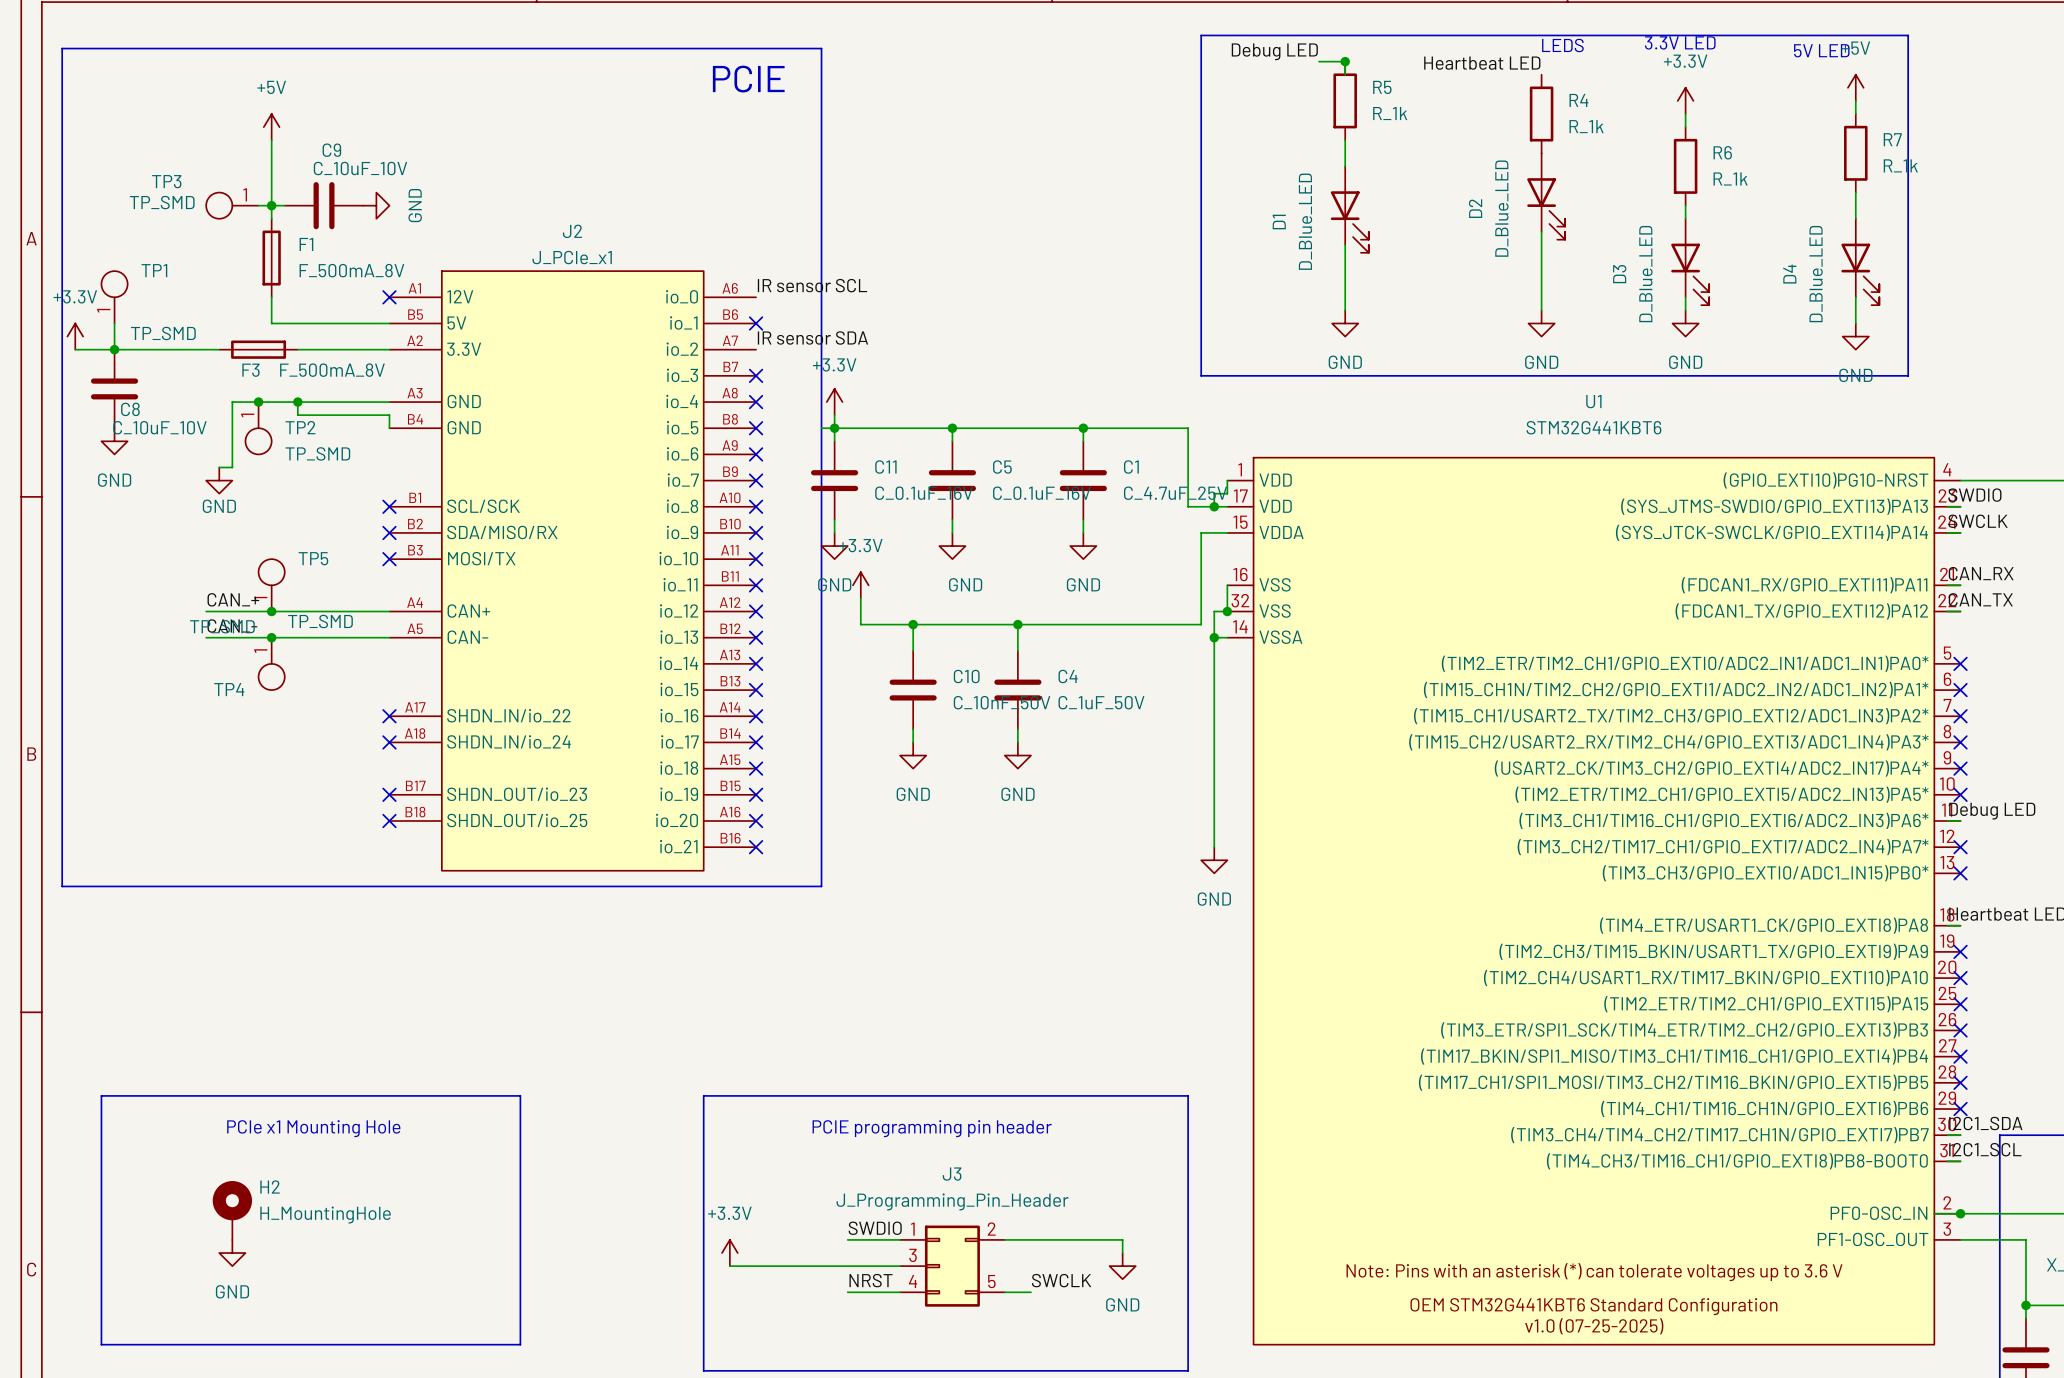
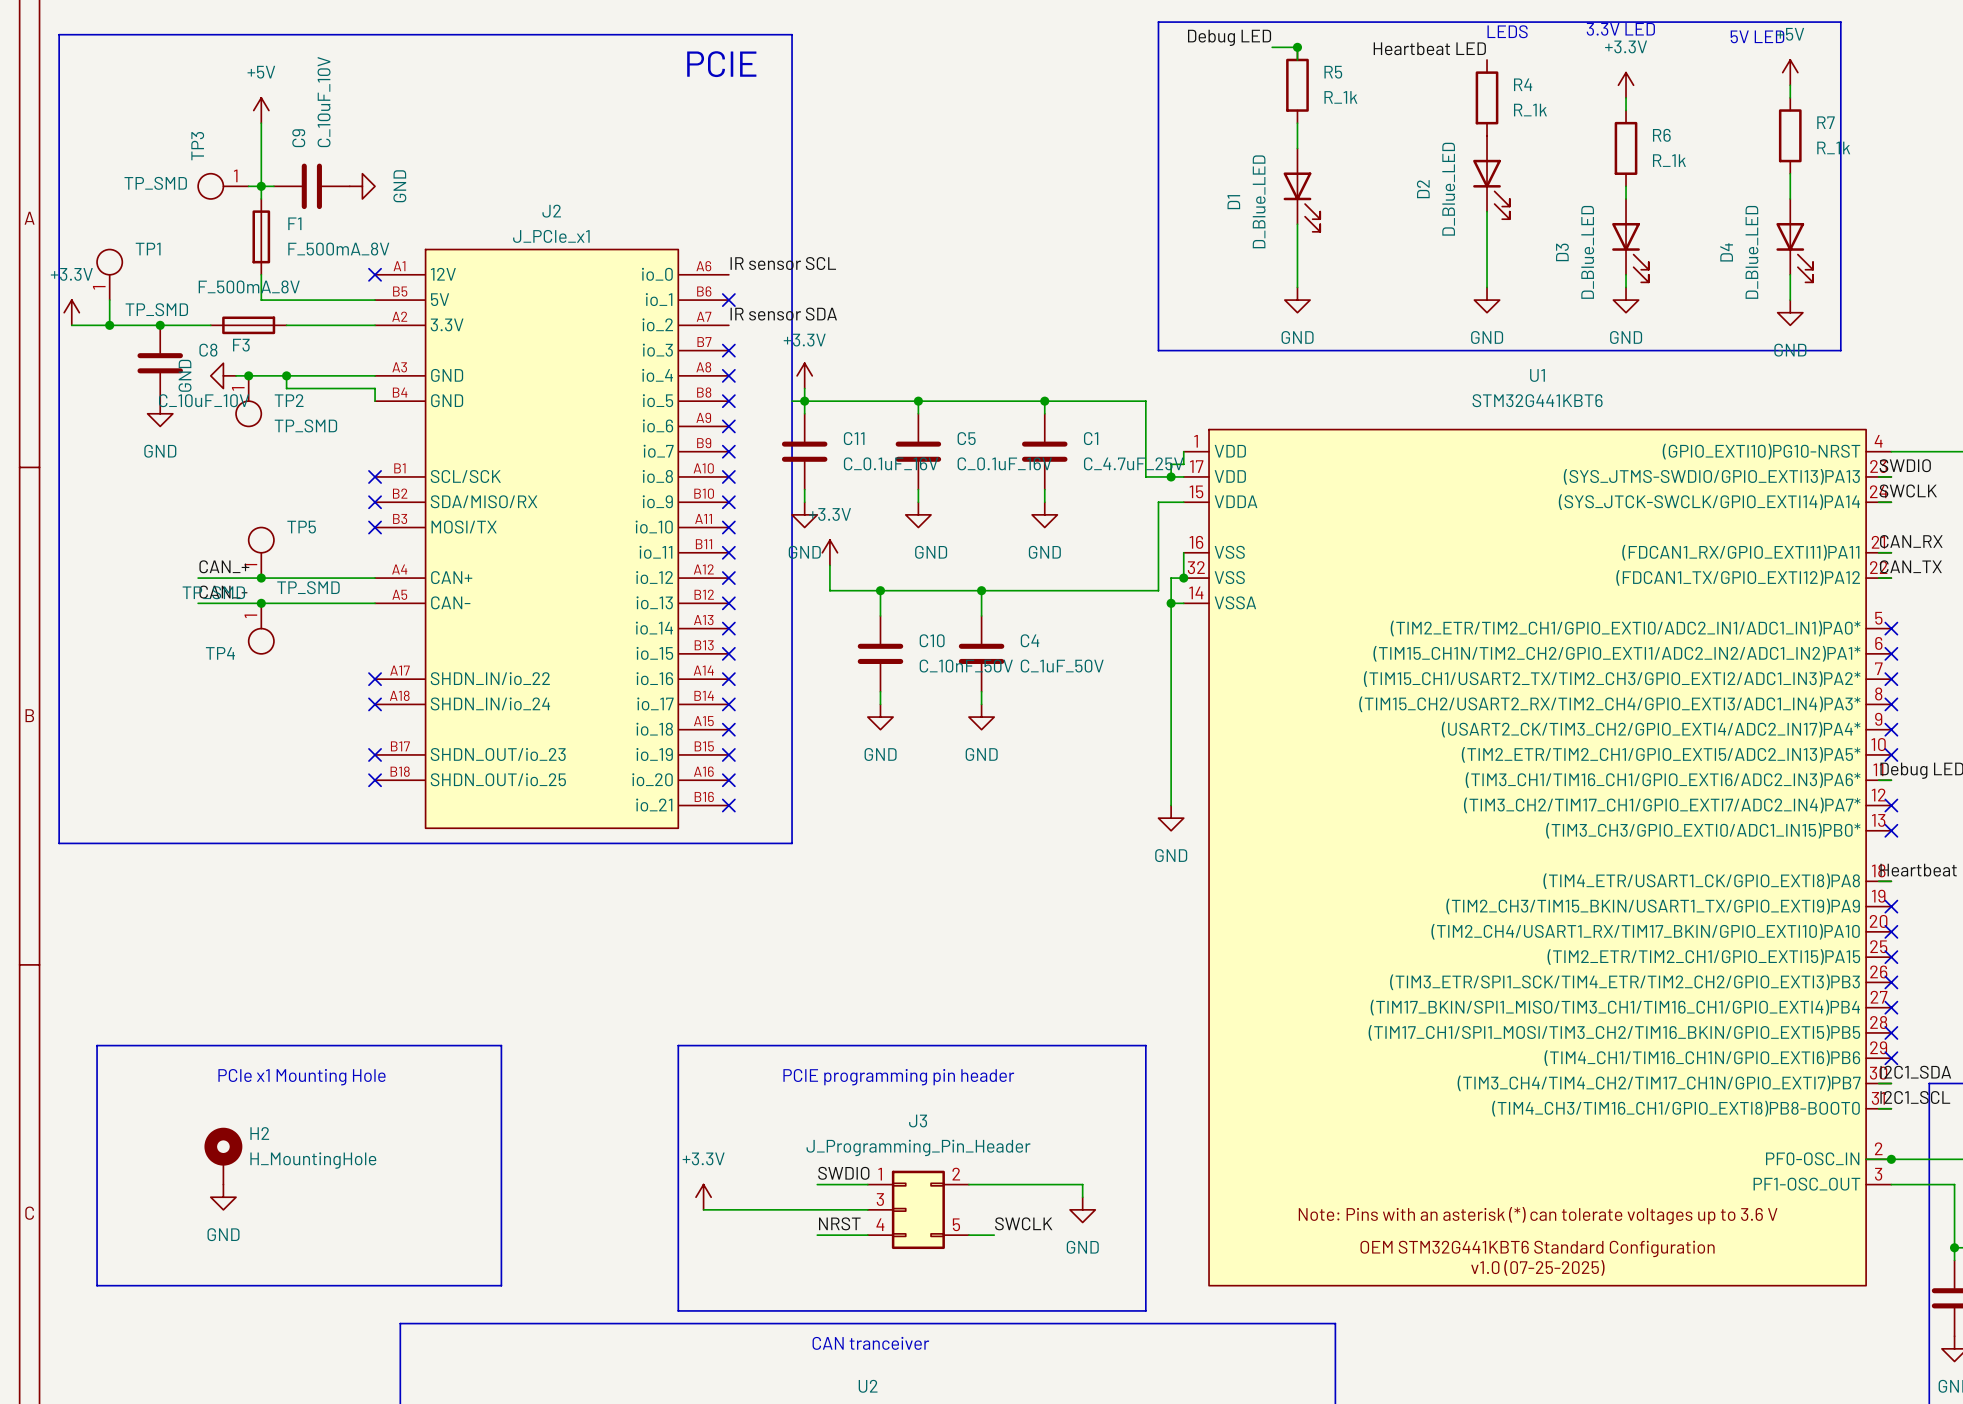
C9 name rotation: 0° (331, 150) -> 90° counterclockwise (298, 138)
C9 value rotation: 0° (360, 168) -> 90° counterclockwise (324, 102)
TP3 name rotation: 0° (166, 181) -> 90° counterclockwise (197, 146)
TP3 name position: TP3 (166, 181) -> TP3 (197, 146)
junction: none -> (160, 325)
F3 value position: F_500mA_8V (332, 370) -> F_500mA_8V (249, 286)
C8 position: (114, 388) -> (160, 363)
power symbol: none -> GND (223, 375)
wire: (245, 402) (232, 402) (232, 467) (219, 467) -> none
C8 name position: C8 (130, 409) -> C8 (208, 350)
power symbol: GND (114, 441) -> none
power symbol: none -> GND (160, 413)
power symbol: GND (219, 480) -> none

